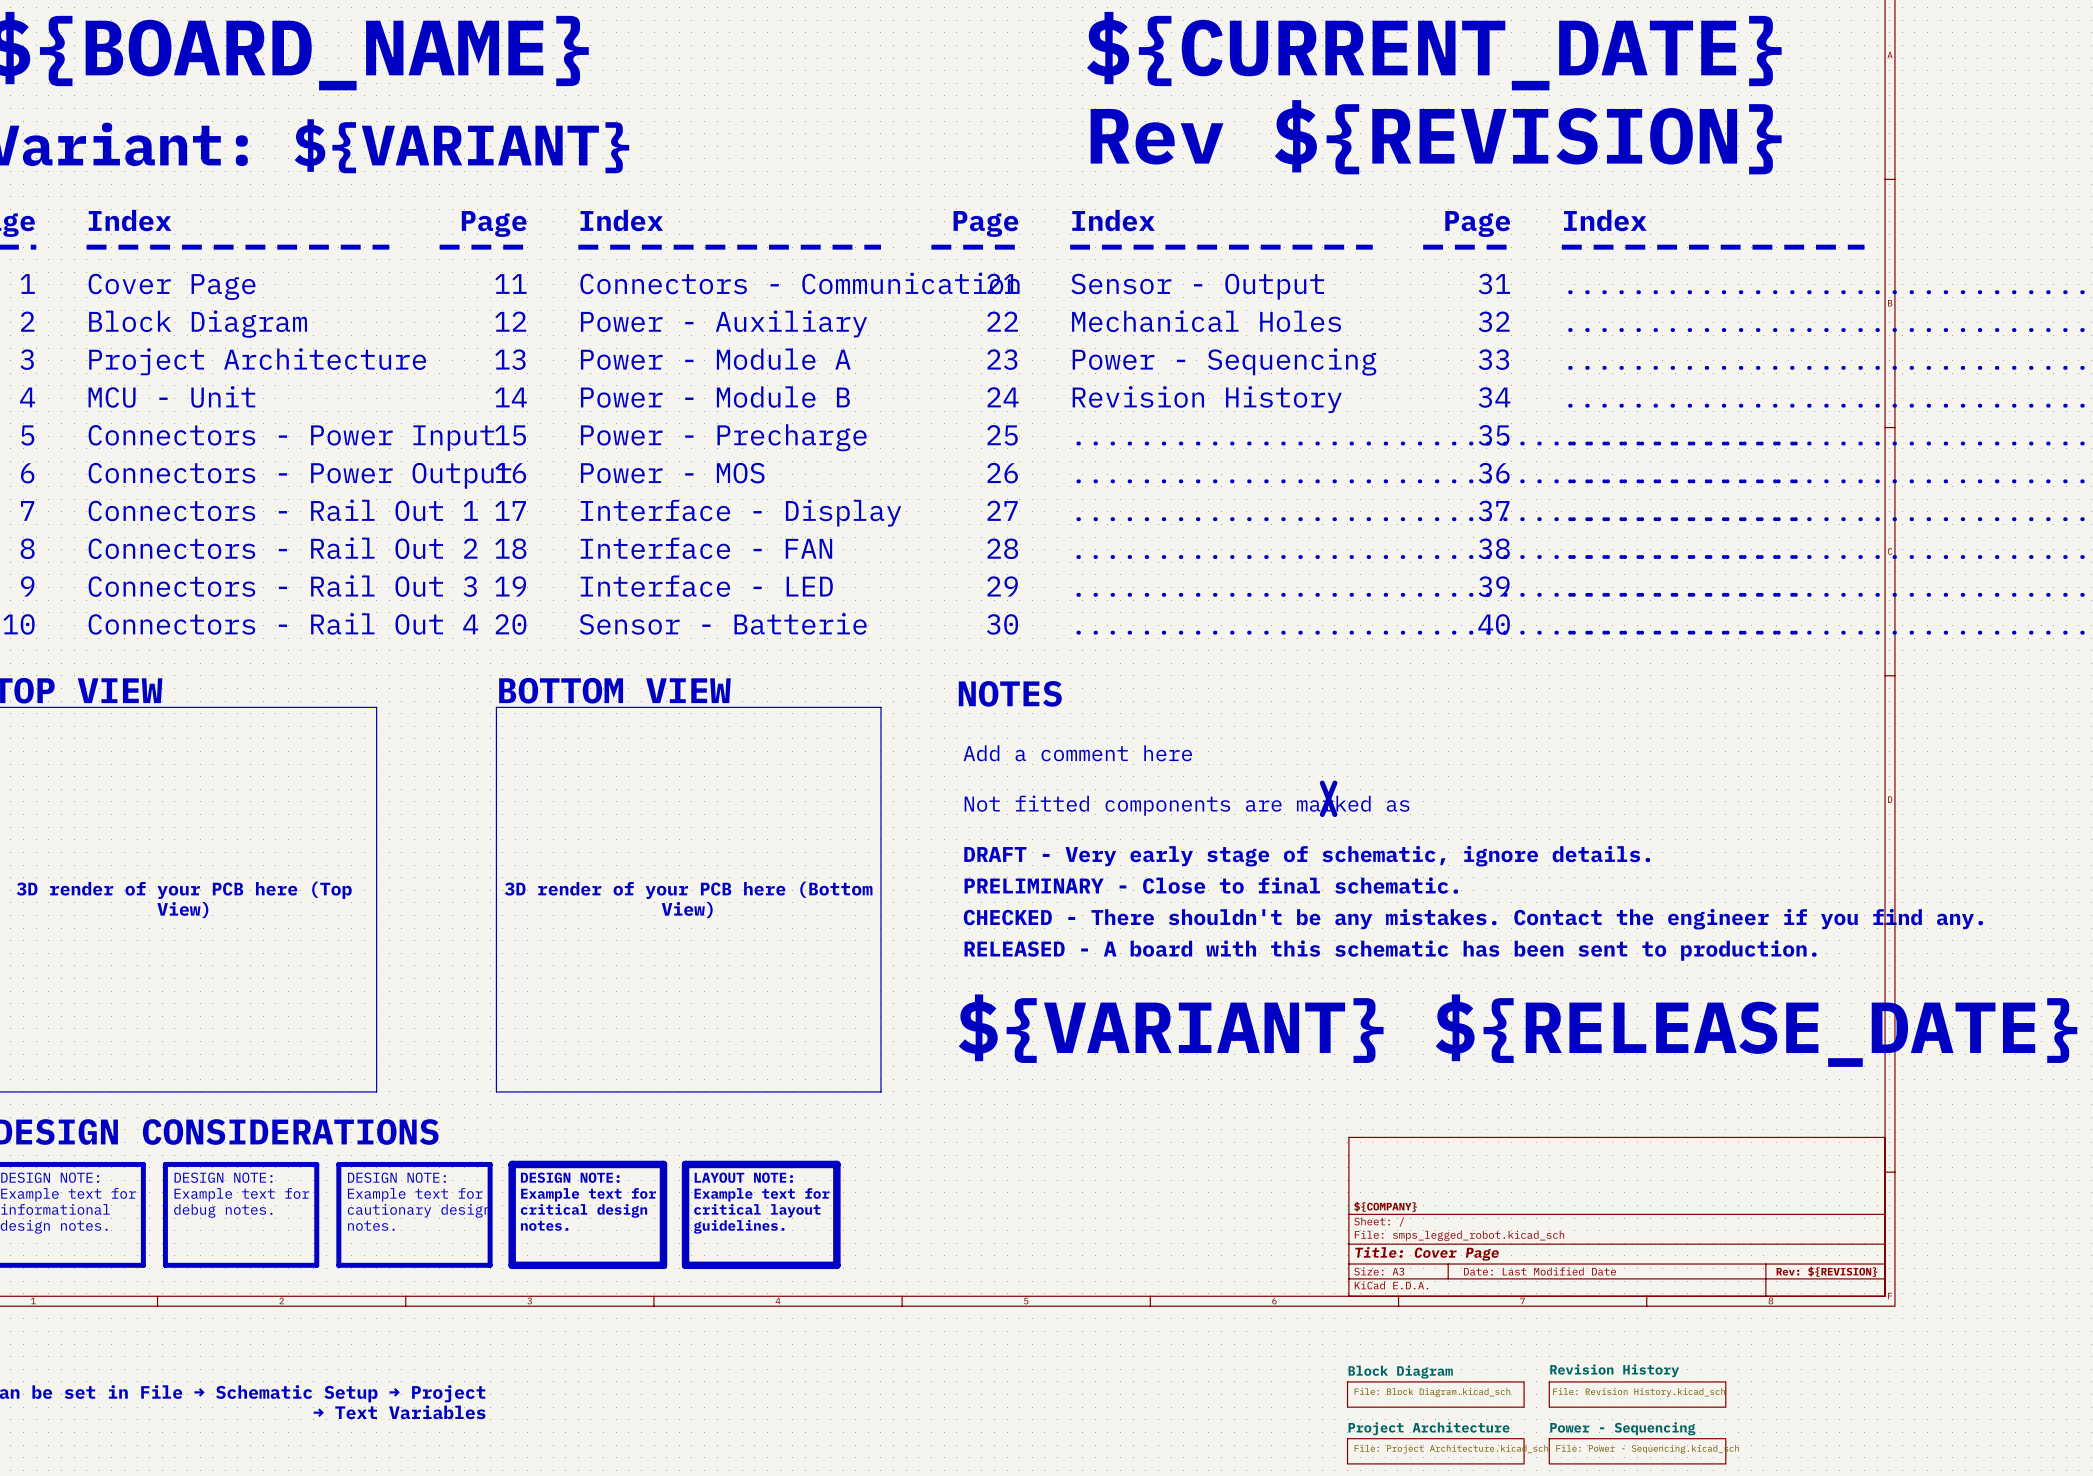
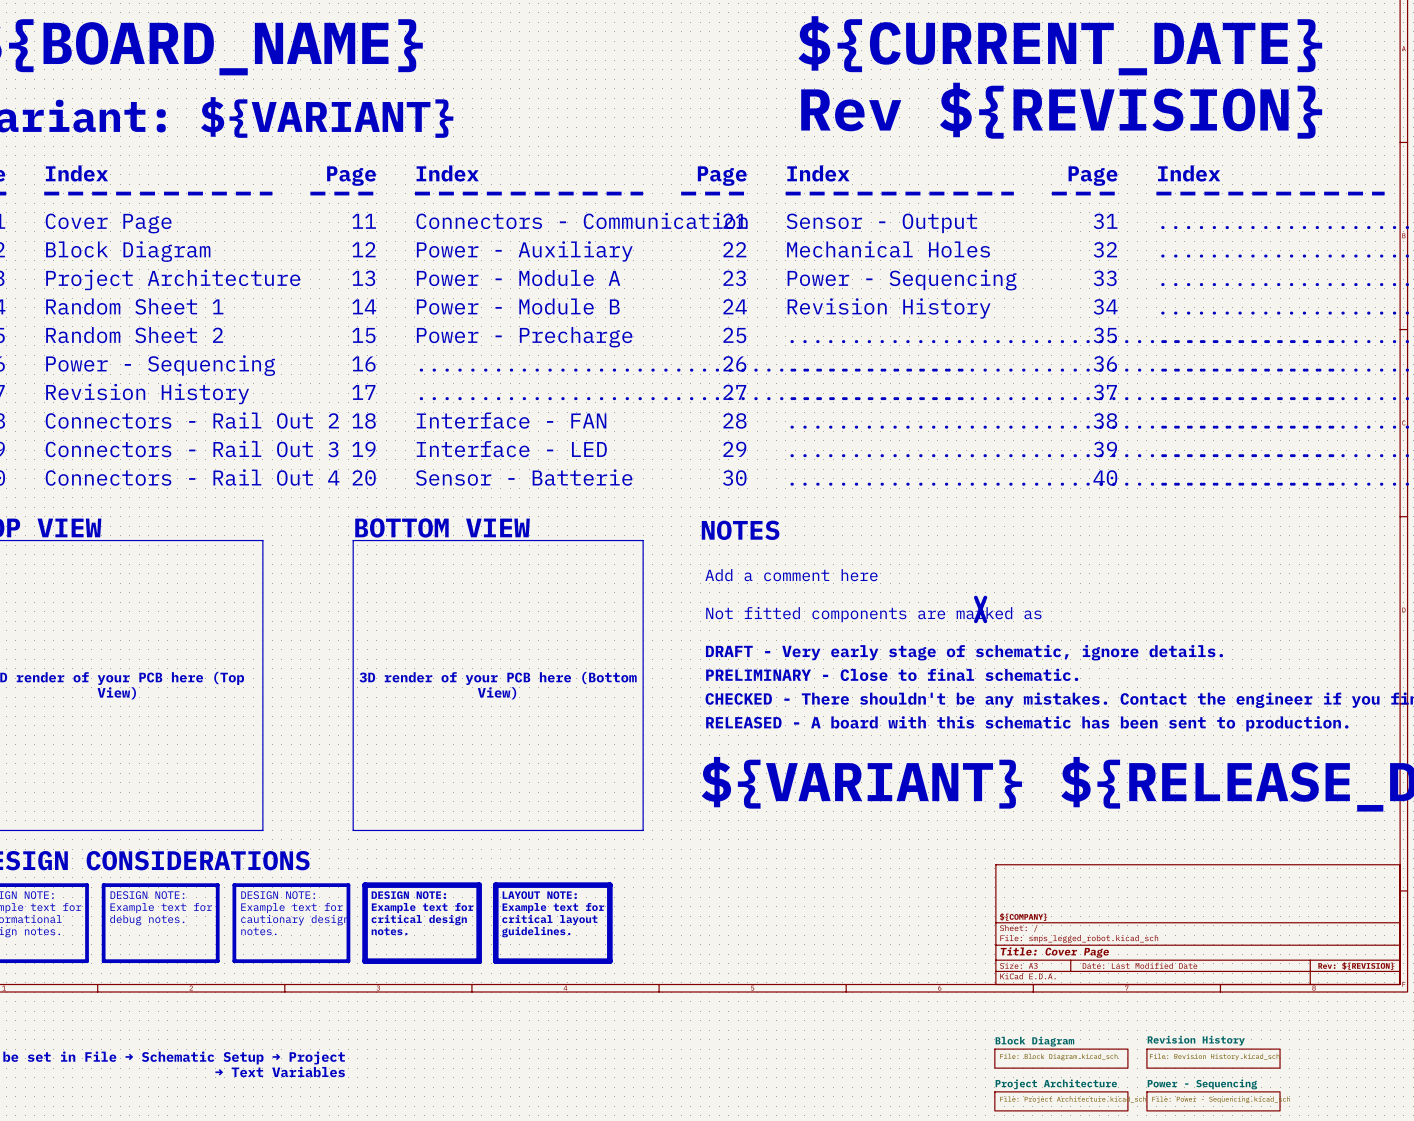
text: MCU - Unit (171, 396) -> Random Sheet 1 (134, 306)
text: Connectors - Power Input (291, 437) -> Random Sheet 2 (134, 335)
text: Power - MOS (672, 473) -> ........................................... (691, 370)
text: Connectors - Power Output (299, 475) -> Power - Sequencing (160, 365)
text: Connectors - Rail Out 1 (283, 510) -> Revision History (147, 394)
text: Interface - Display (740, 513) -> ........................................... (691, 398)

